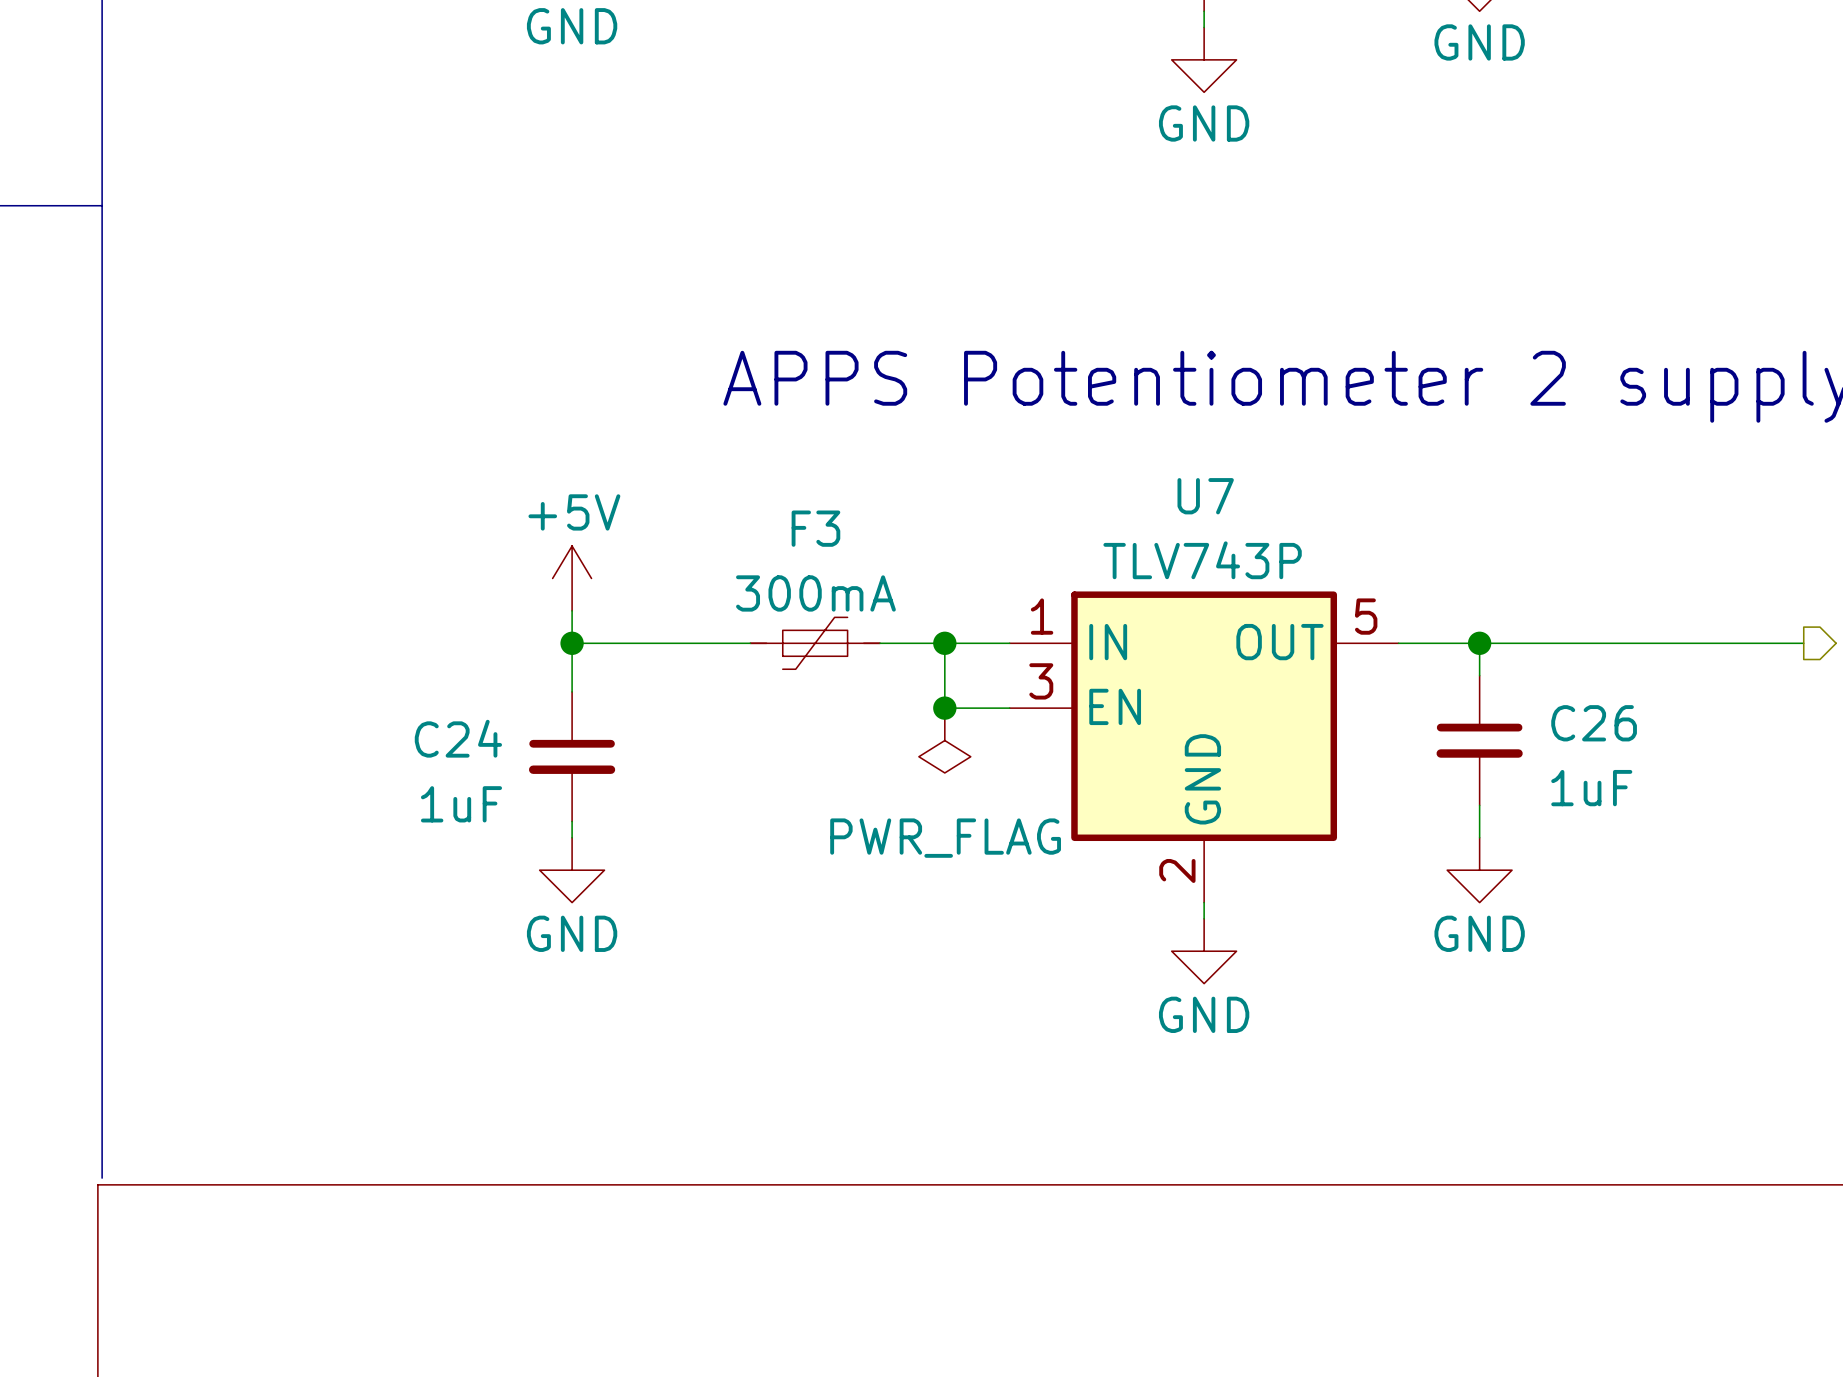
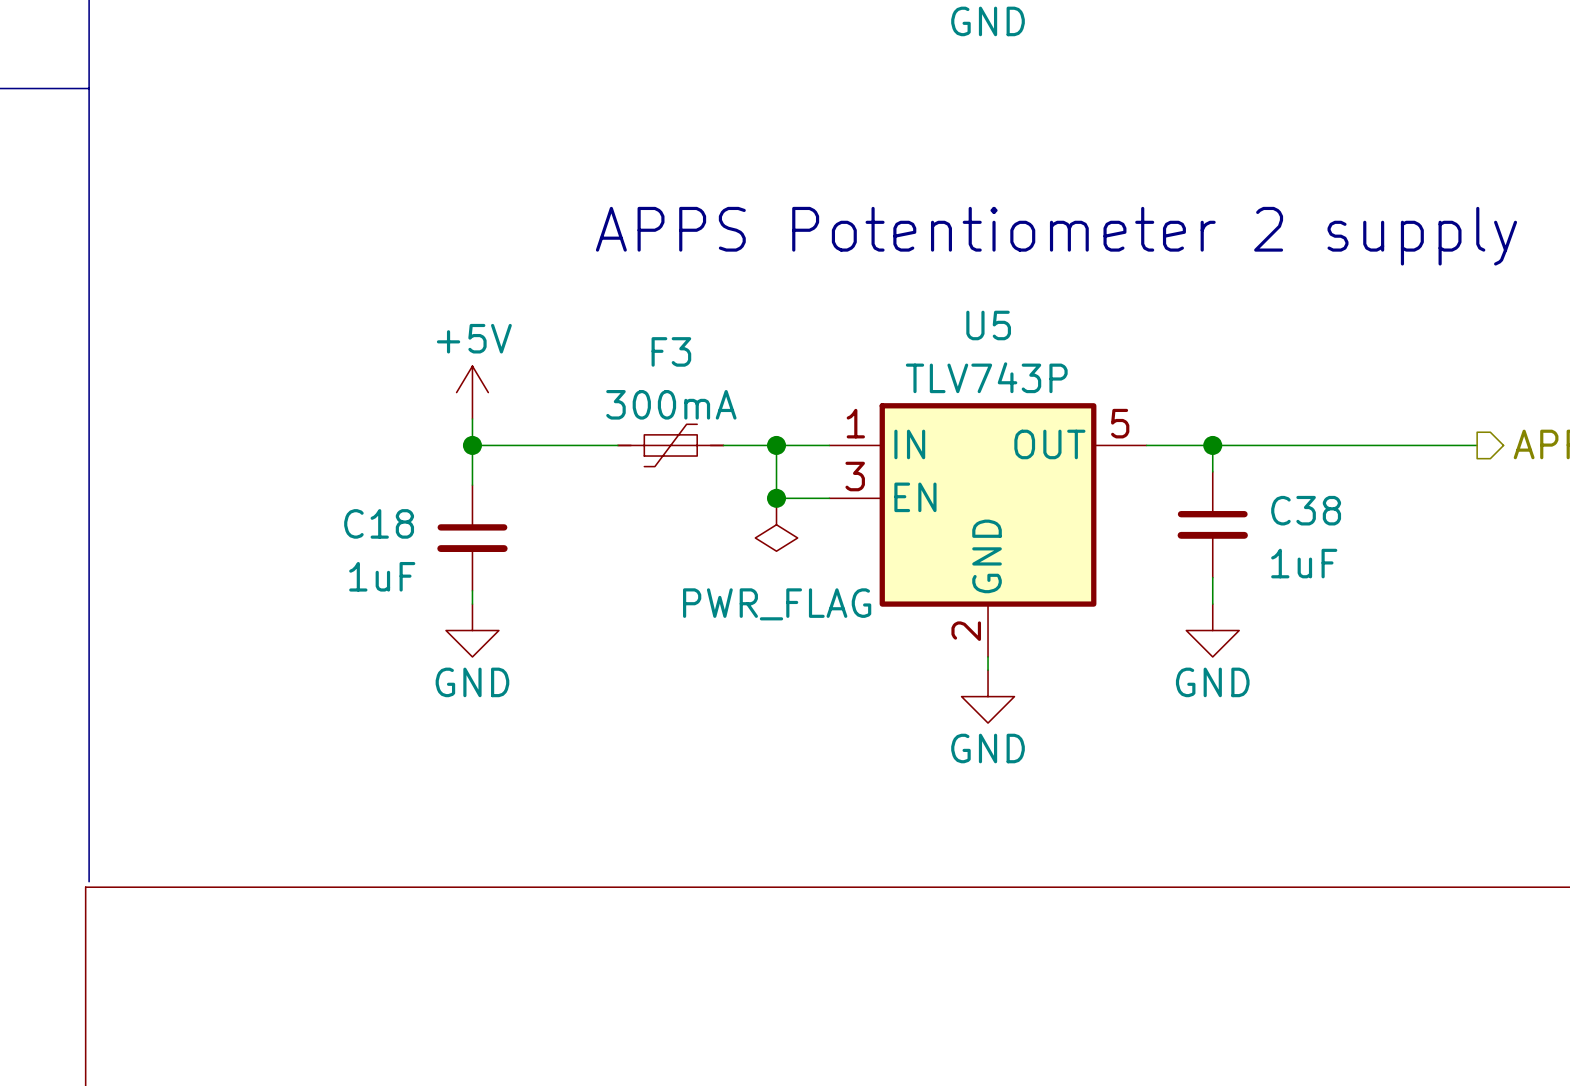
U7 name: U7 (1205, 496) -> U5 (988, 325)
C26 name: C26 (1594, 723) -> C38 (1306, 510)
C24 name: C24 (458, 738) -> C18 (379, 523)

